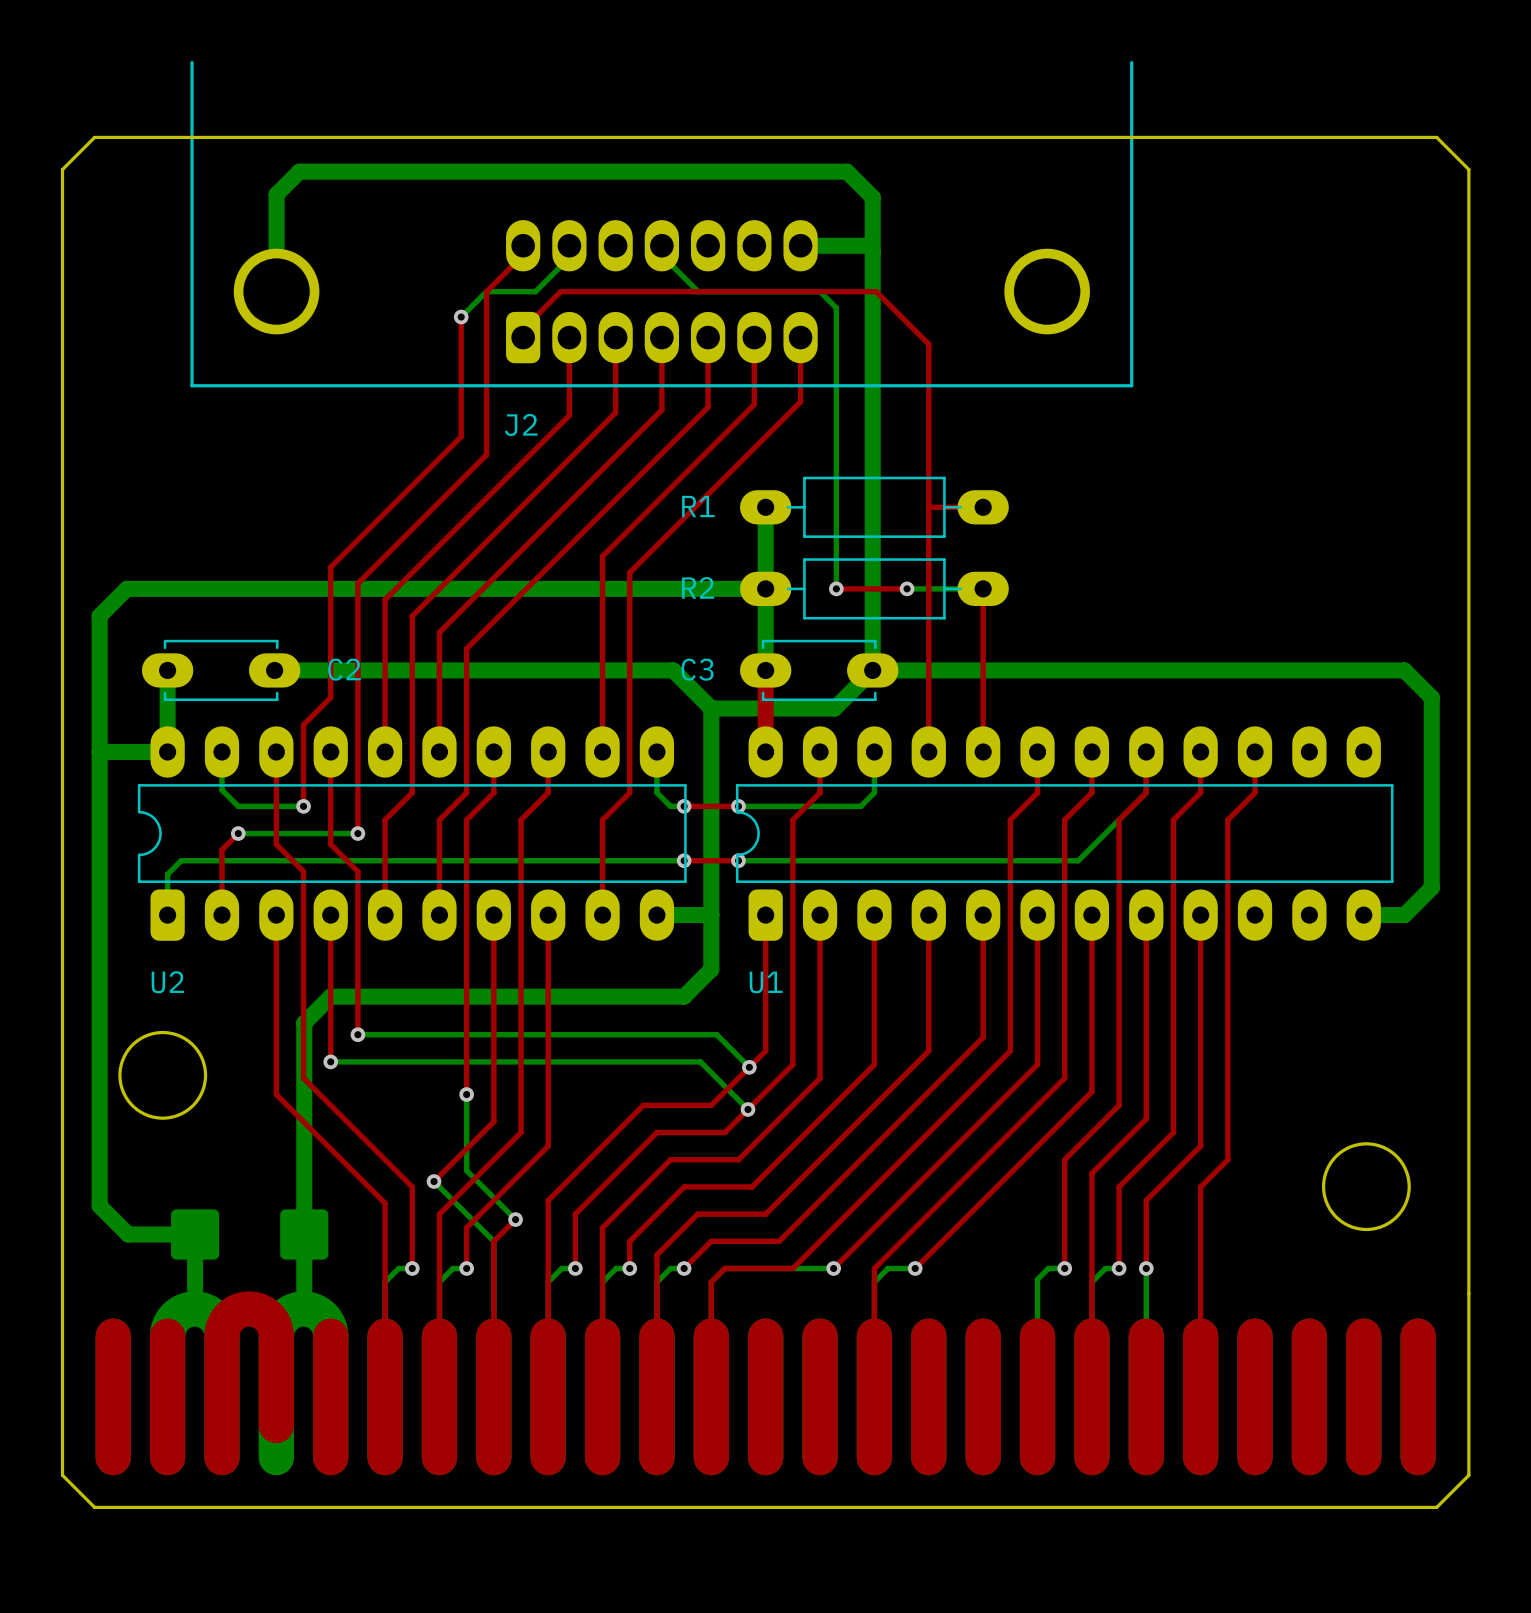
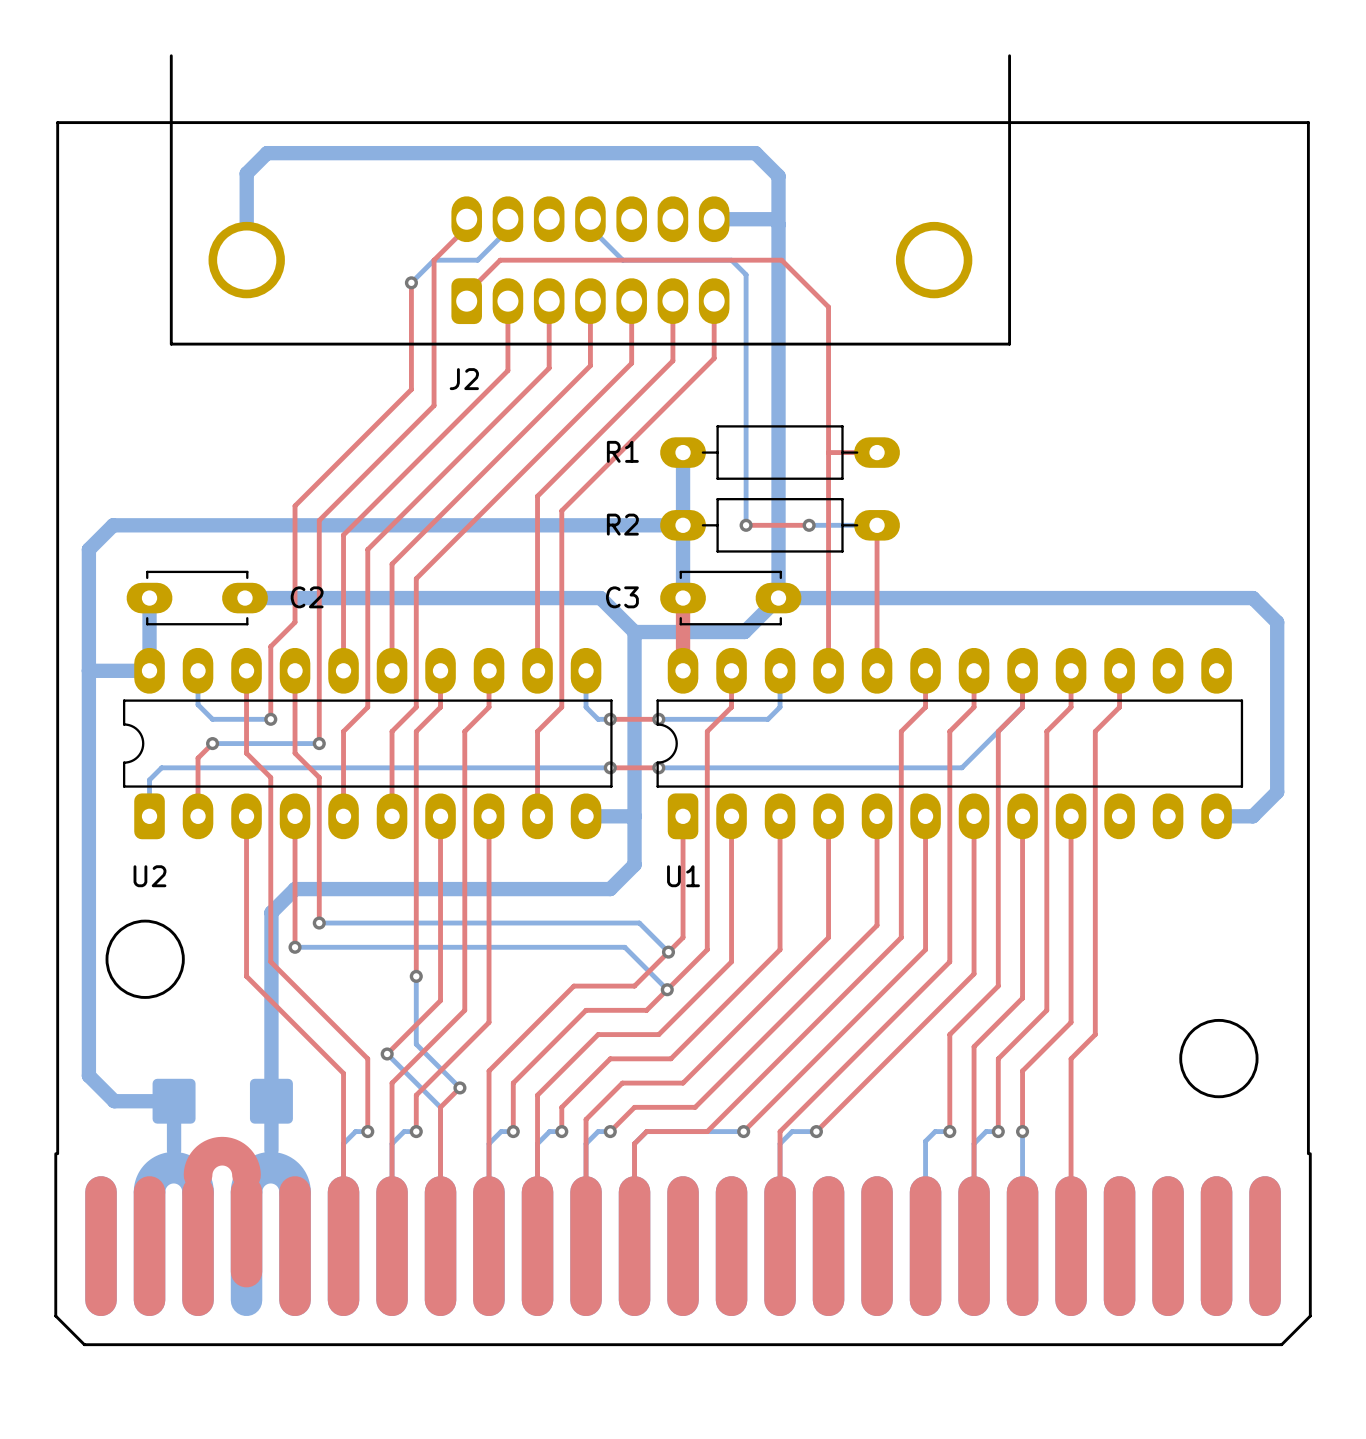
board edge: (94, 137) (62, 169) (62, 1293) -> (84, 122) (57, 122) (57, 1153)
board edge: (1436, 137) (1468, 169) (1468, 1293) -> (1281, 122) (1308, 122) (1308, 1153)
top track: (221, 1336) (223, 1326) (228, 1318) (239, 1310) (249, 1308) (258, 1310) (269, 1318) (274, 1326) (276, 1336) -> (198, 1175) (199, 1166) (204, 1159) (213, 1152) (222, 1151) (230, 1152) (238, 1157) (243, 1164) (246, 1175)

